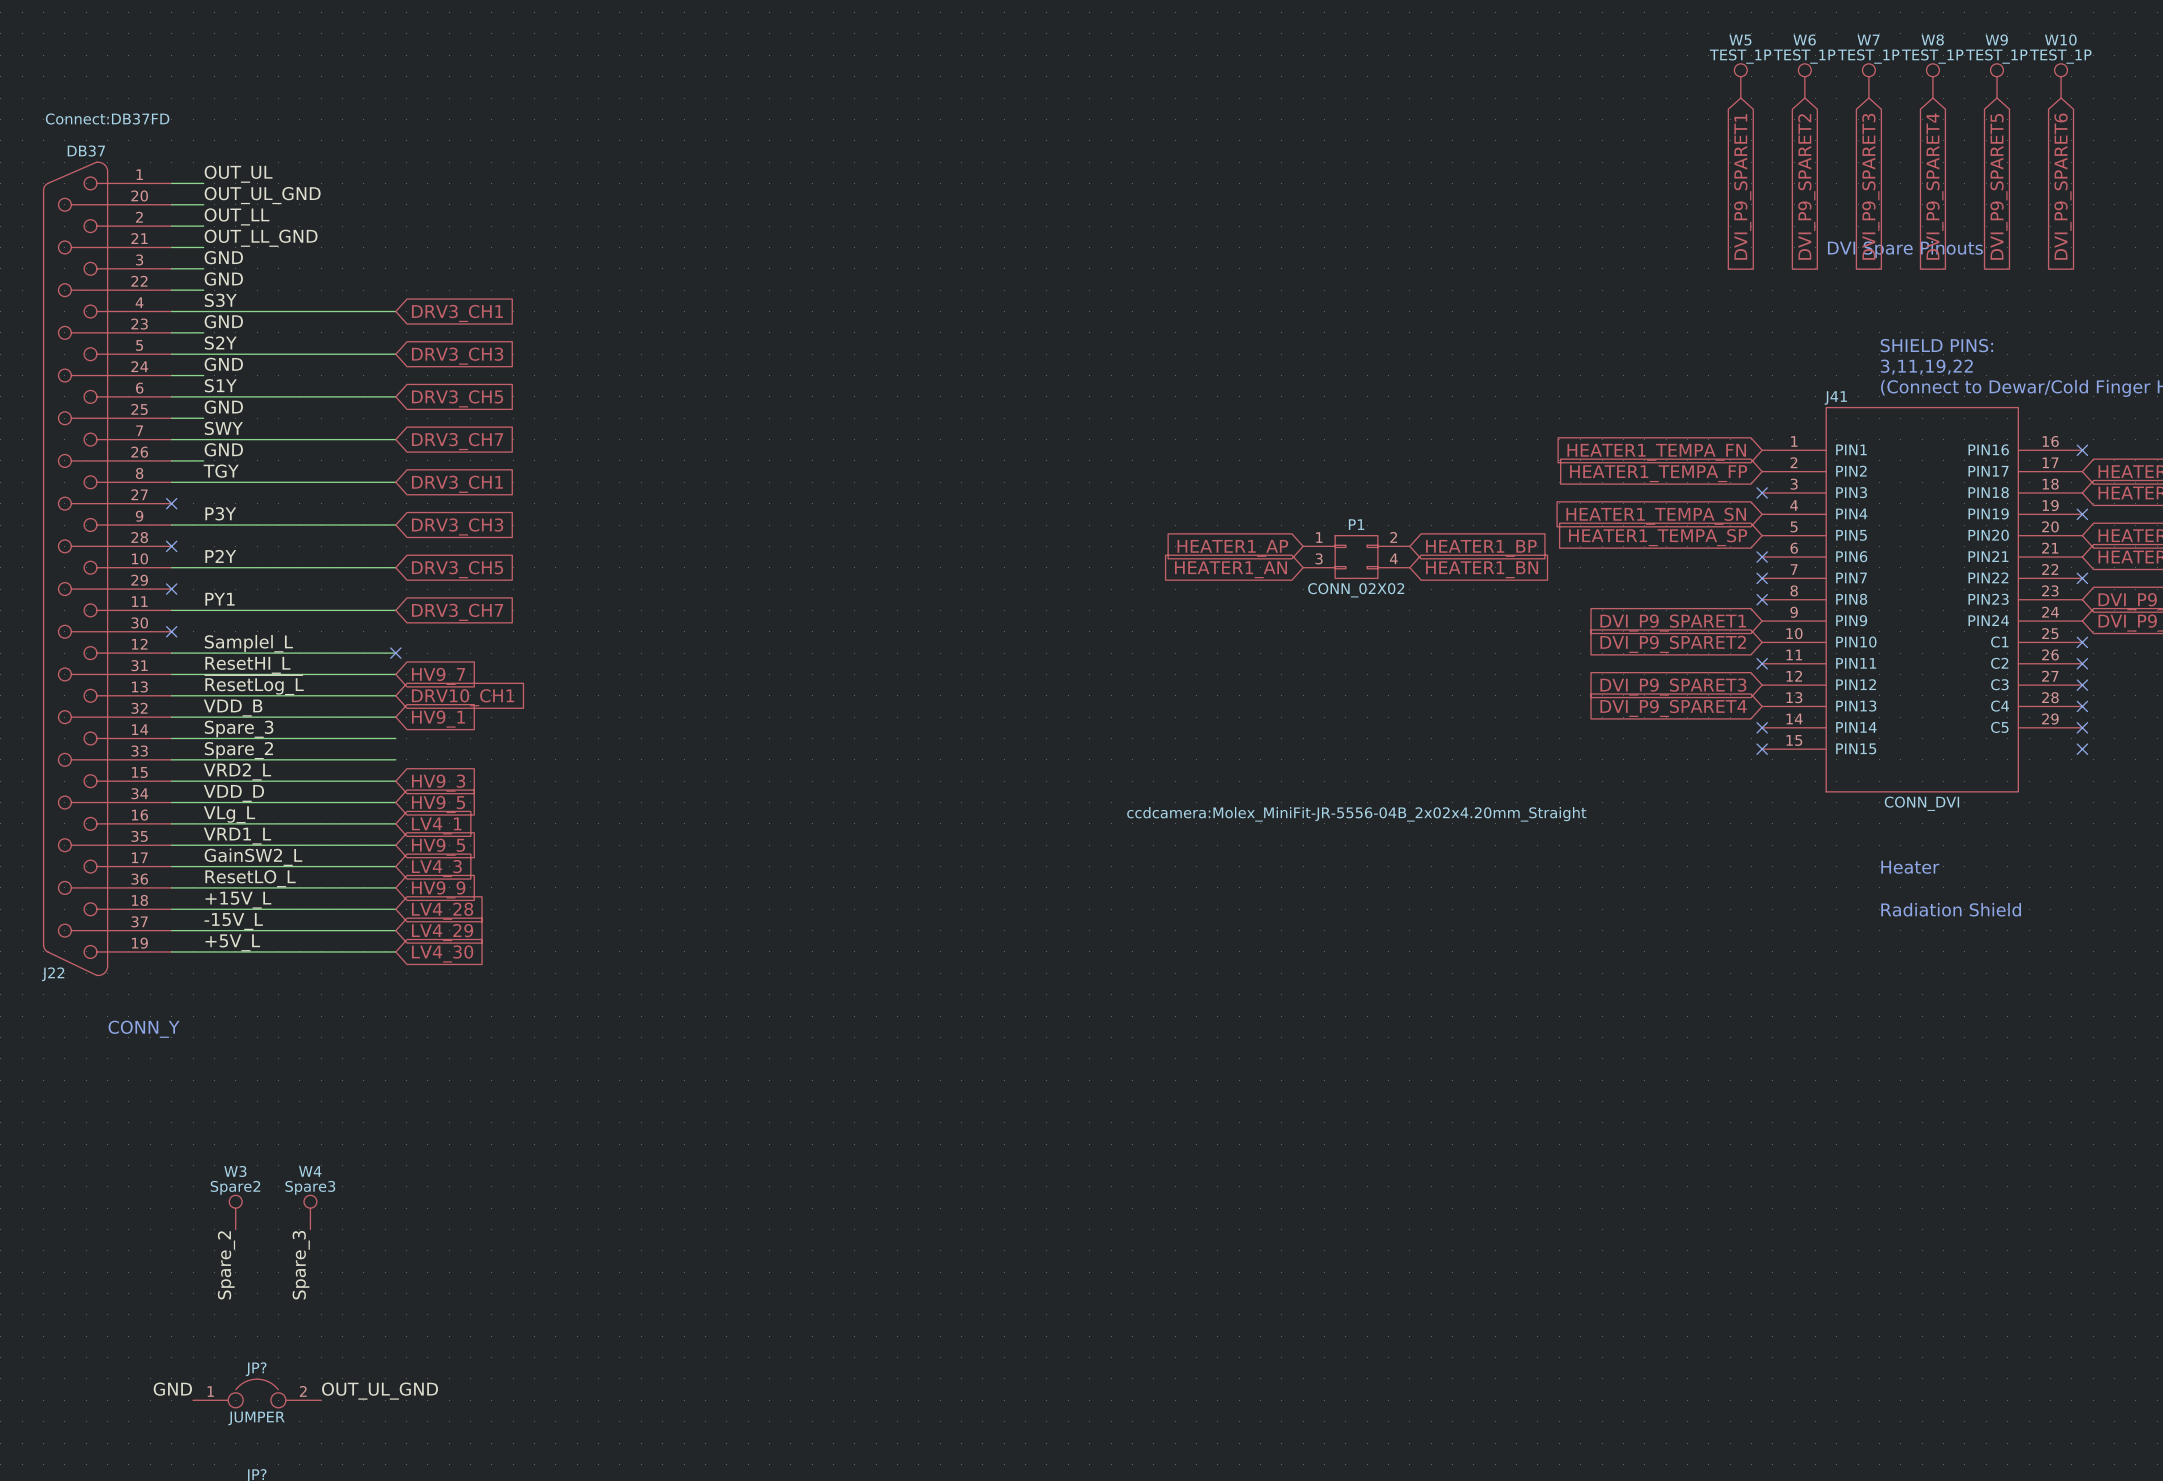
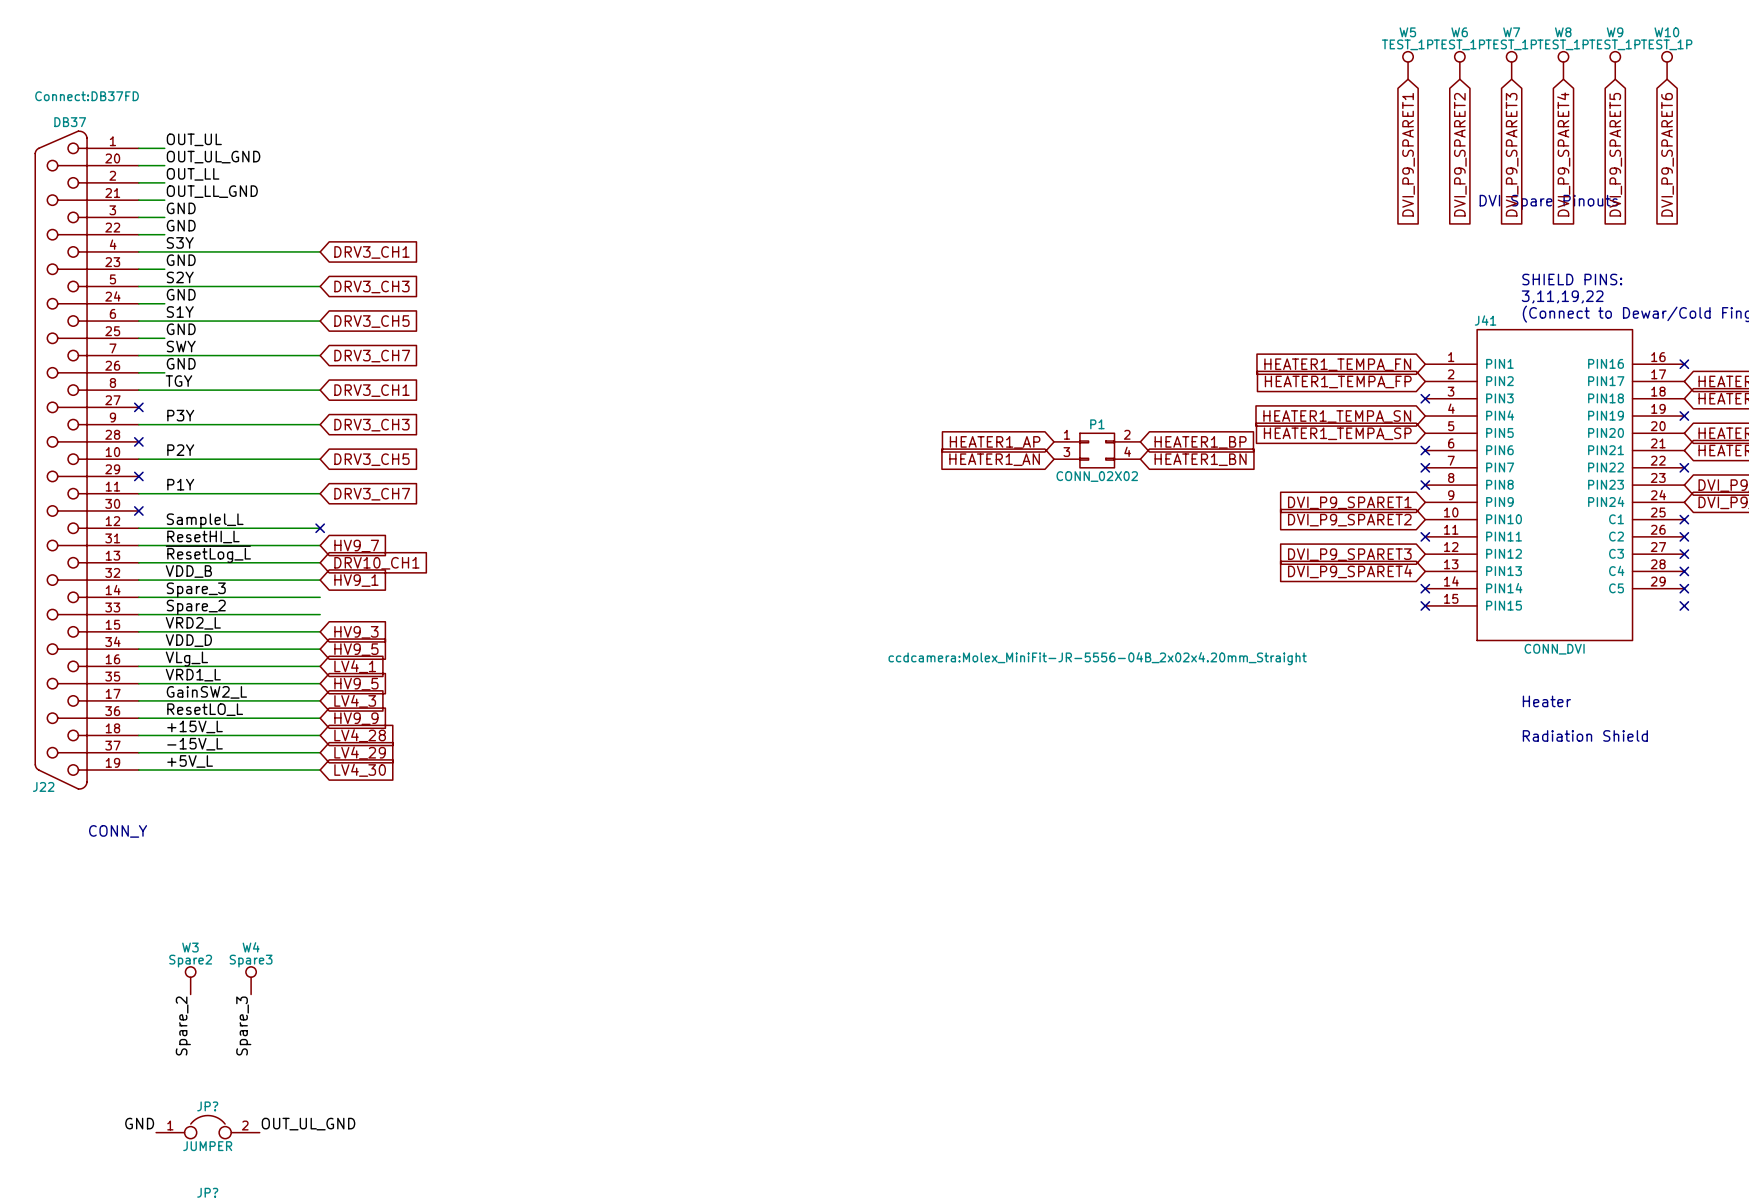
label: PY1 (219, 599) -> P1Y (180, 484)

